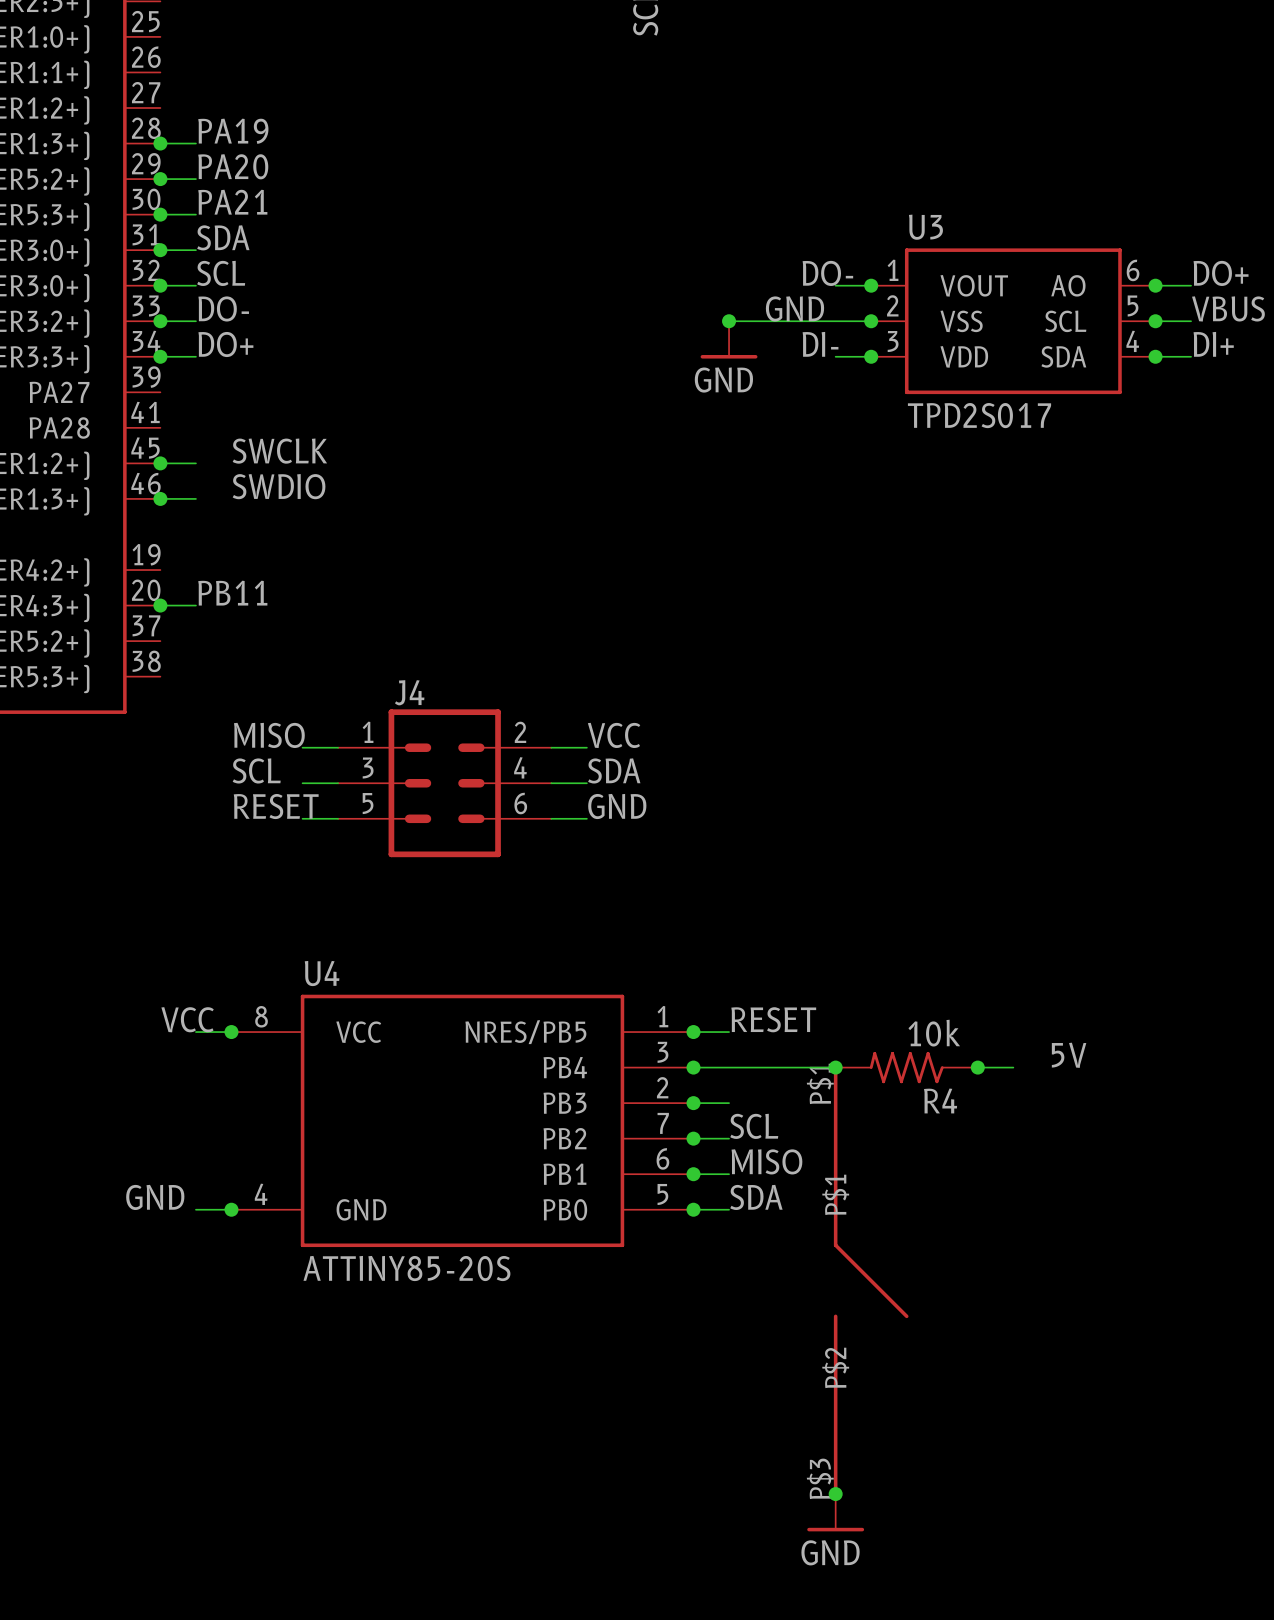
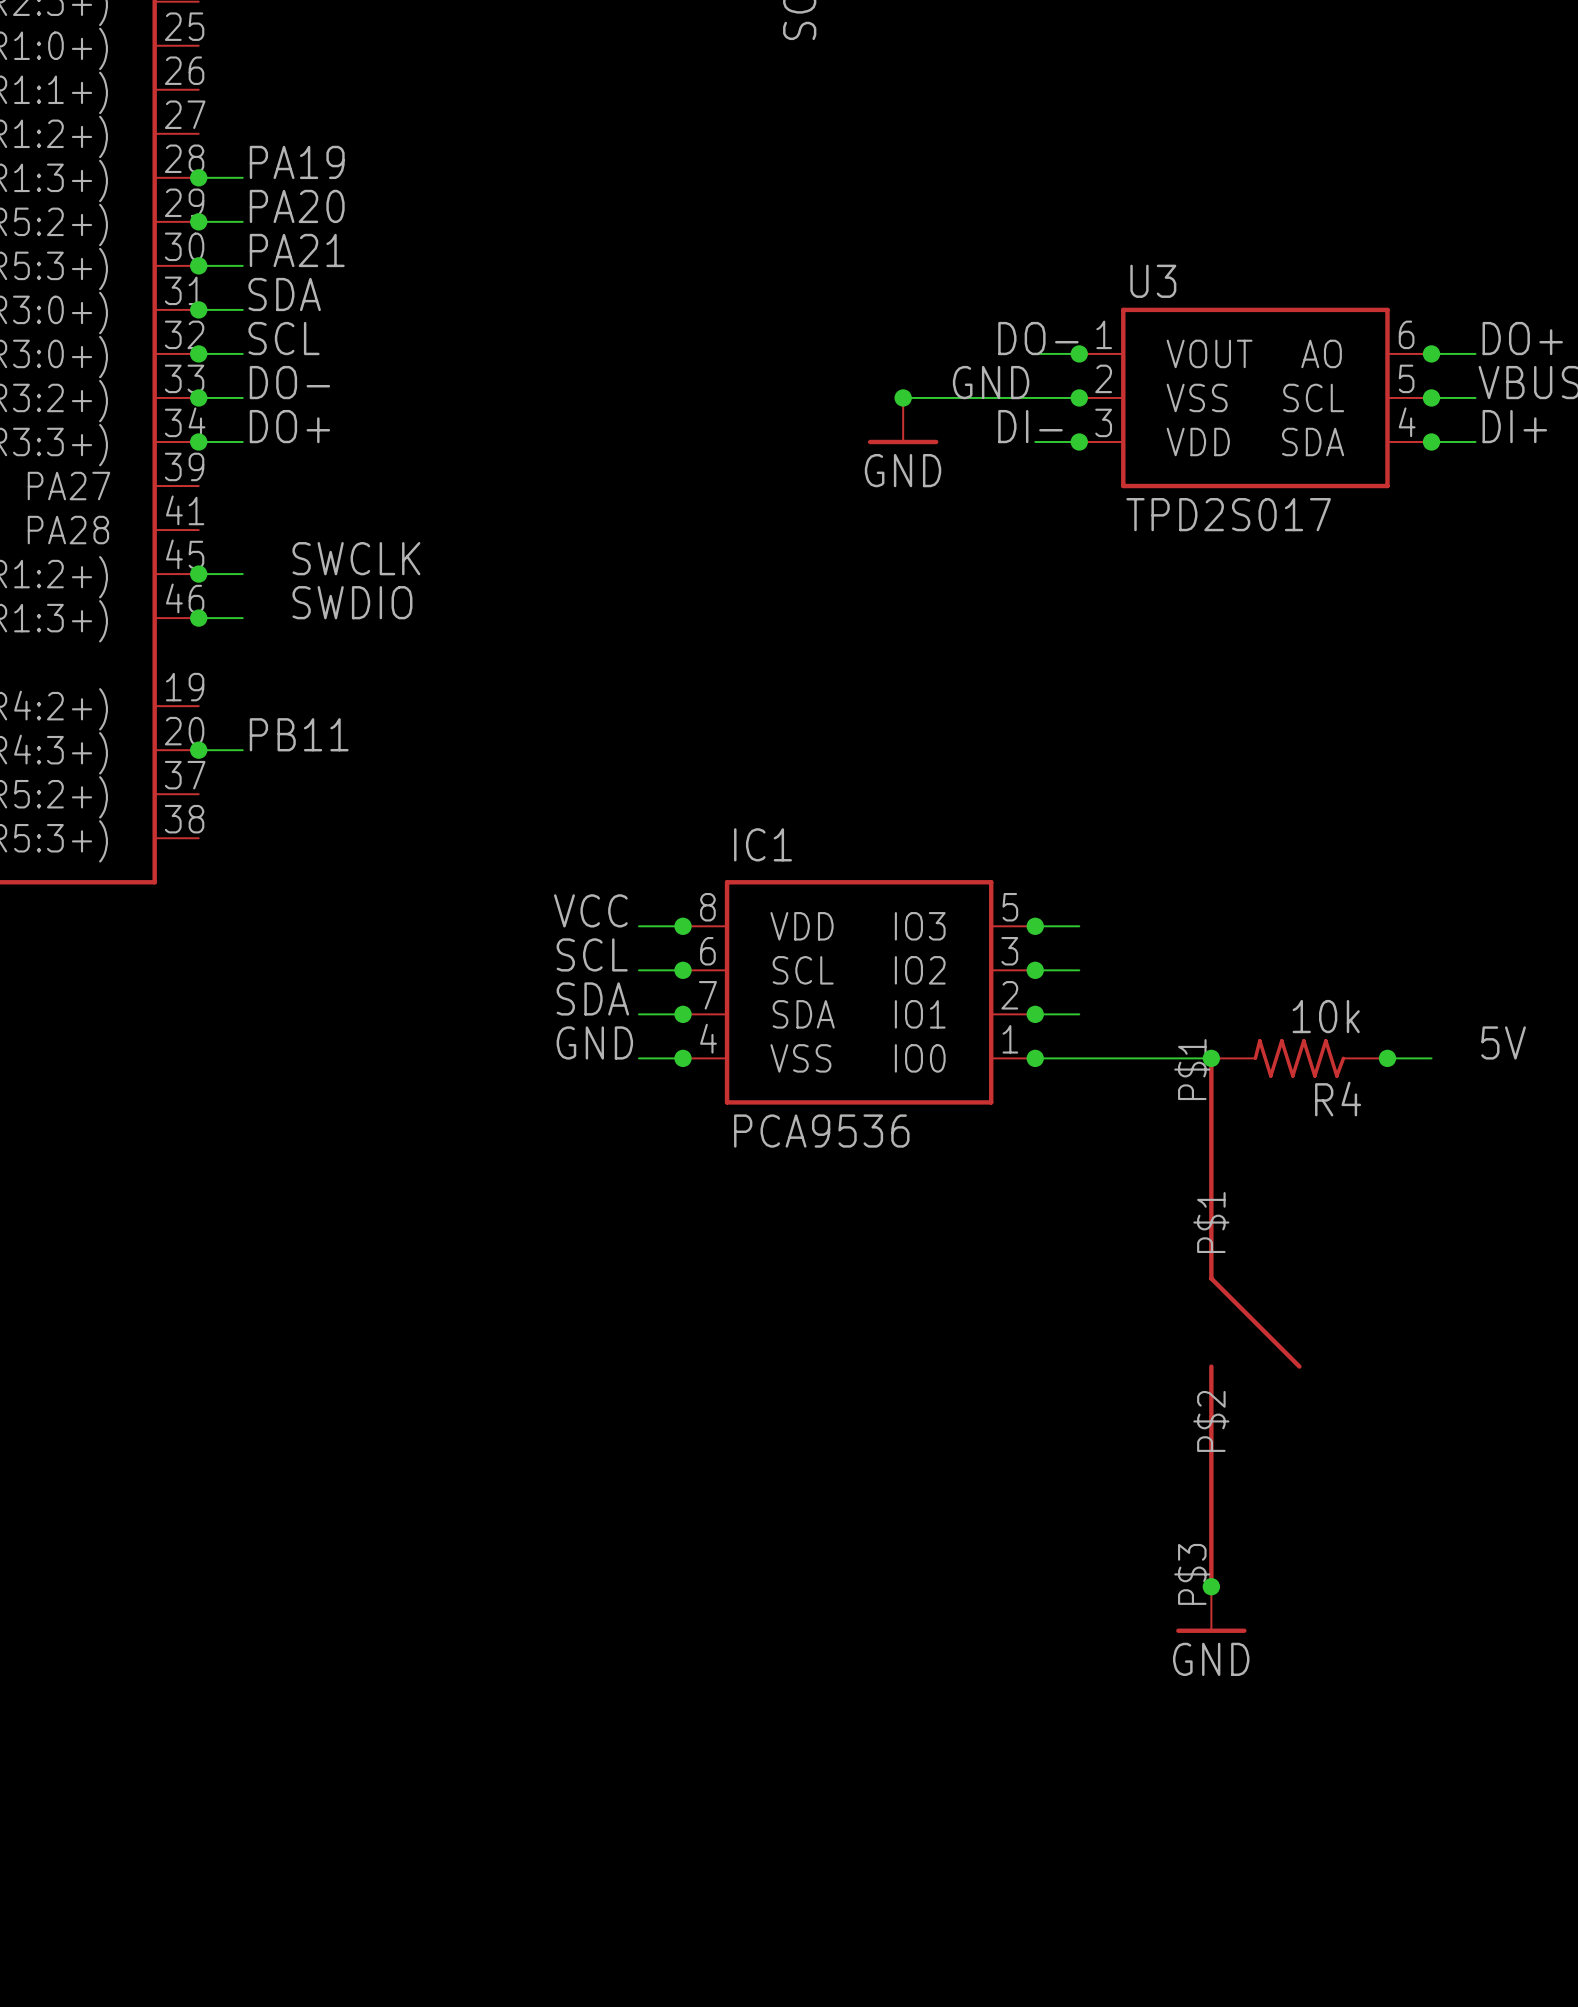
label: MISO (269, 735) -> none
label position: VCC (614, 735) -> VCC (590, 910)
wire: (302, 747) (338, 747) -> none
junction: none -> (683, 926)
wire: none -> (1035, 926) (1079, 926)
junction: none -> (1035, 926)
label position: SCL (256, 770) -> SCL (592, 954)
label position: SDA (614, 770) -> SDA (592, 998)
wire: (302, 783) (338, 783) -> none
J4: (444, 783) -> none
junction: none -> (683, 970)
wire: none -> (1035, 970) (1079, 970)
junction: none -> (1035, 970)
IC1: none -> PCA9536 (859, 992)
label: RESET (276, 806) -> none
label position: GND (617, 806) -> GND (594, 1042)
wire: (302, 818) (338, 818) -> (639, 1058) (683, 1058)
junction: none -> (683, 1014)
junction: none -> (1035, 1014)
junction: none -> (683, 1058)
junction: none -> (1035, 1058)
junction: none -> (1211, 1058)
junction: none -> (1387, 1058)
label: VCC (187, 1019) -> none
label: RESET (773, 1019) -> none
wire: (195, 1032) (231, 1032) -> none
junction: (231, 1032) -> none
wire: (693, 1032) (729, 1032) -> (1035, 1014) (1079, 1014)
junction: (693, 1032) -> none
label position: 5V (1069, 1055) -> 5V (1503, 1042)
wire: (693, 1067) (835, 1067) -> (1035, 1058) (1211, 1058)
junction: (693, 1067) -> none
junction: (835, 1067) -> none
R4 position: (906, 1067) -> (1299, 1058)
wire: (977, 1067) (1013, 1067) -> (1387, 1058) (1431, 1058)
junction: (977, 1067) -> none
wire: (693, 1103) (729, 1103) -> none
junction: (693, 1103) -> none
U4: ATTINY85-20S (462, 1120) -> none
label: SCL (754, 1126) -> none
wire: (693, 1138) (729, 1138) -> none
junction: (693, 1138) -> none
label: MISO (766, 1161) -> none
wire: (693, 1174) (729, 1174) -> none
junction: (693, 1174) -> none
label: GND (155, 1197) -> none
label: SDA (756, 1197) -> none
wire: (195, 1209) (231, 1209) -> none
junction: (231, 1209) -> none
wire: (693, 1209) (729, 1209) -> none
junction: (693, 1209) -> none
part position: (871, 1280) -> (1255, 1322)
junction: none -> (1211, 1586)
junction: (835, 1494) -> none
power symbol position: GND (835, 1512) -> GND (1211, 1609)

